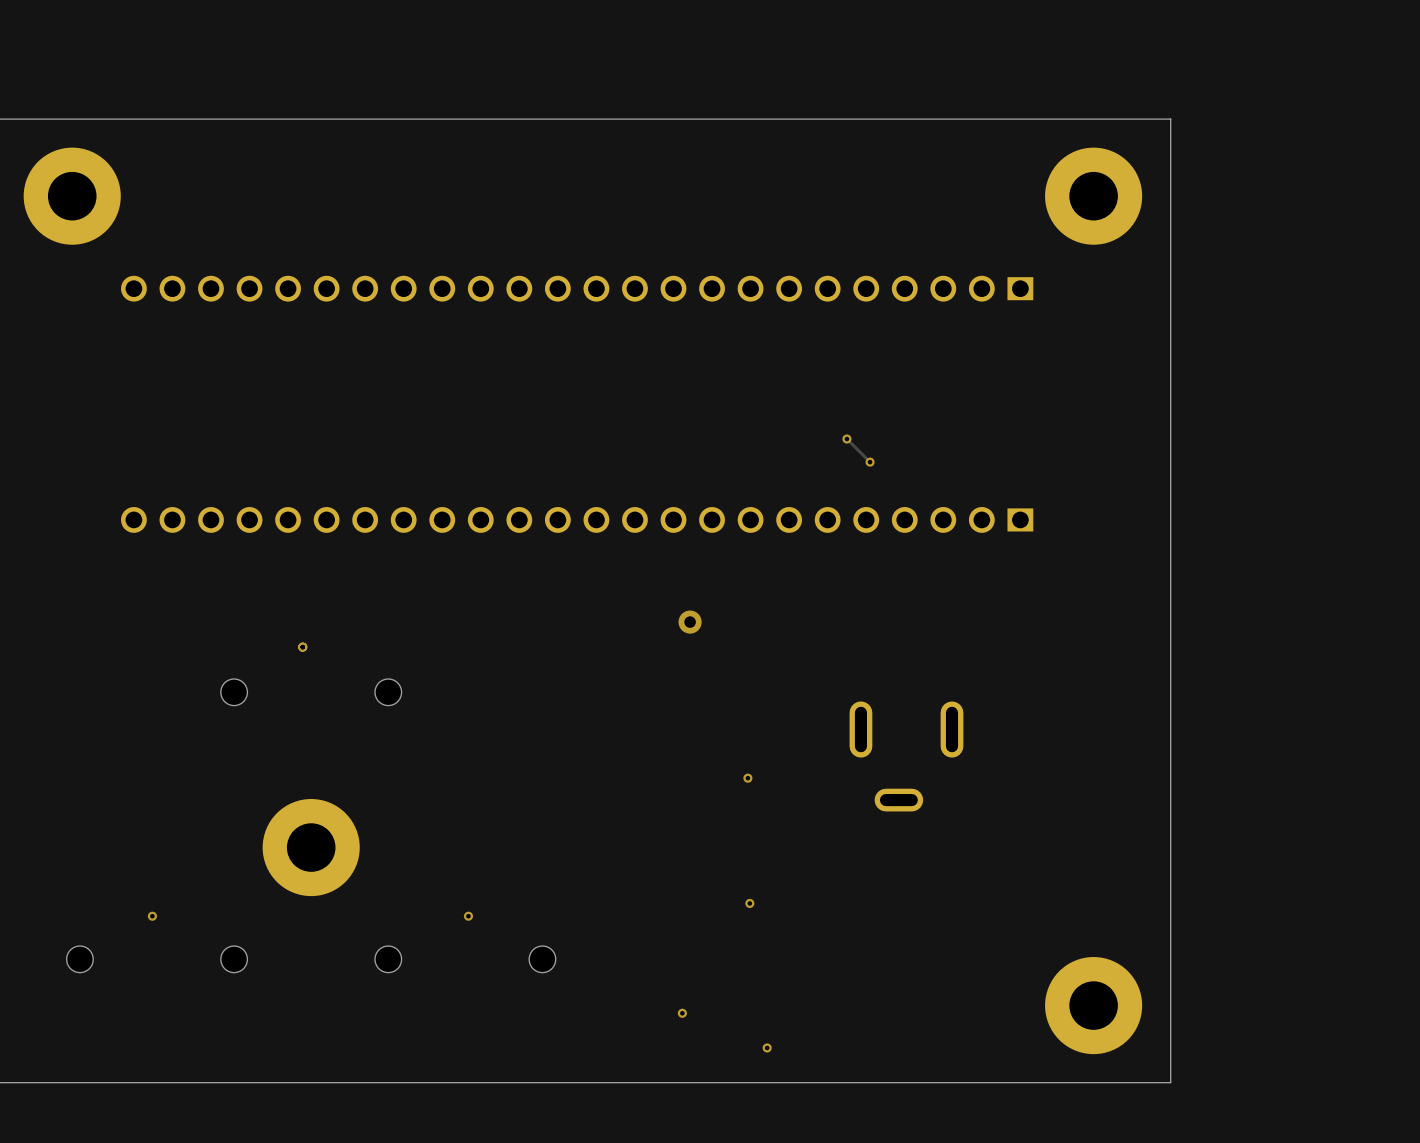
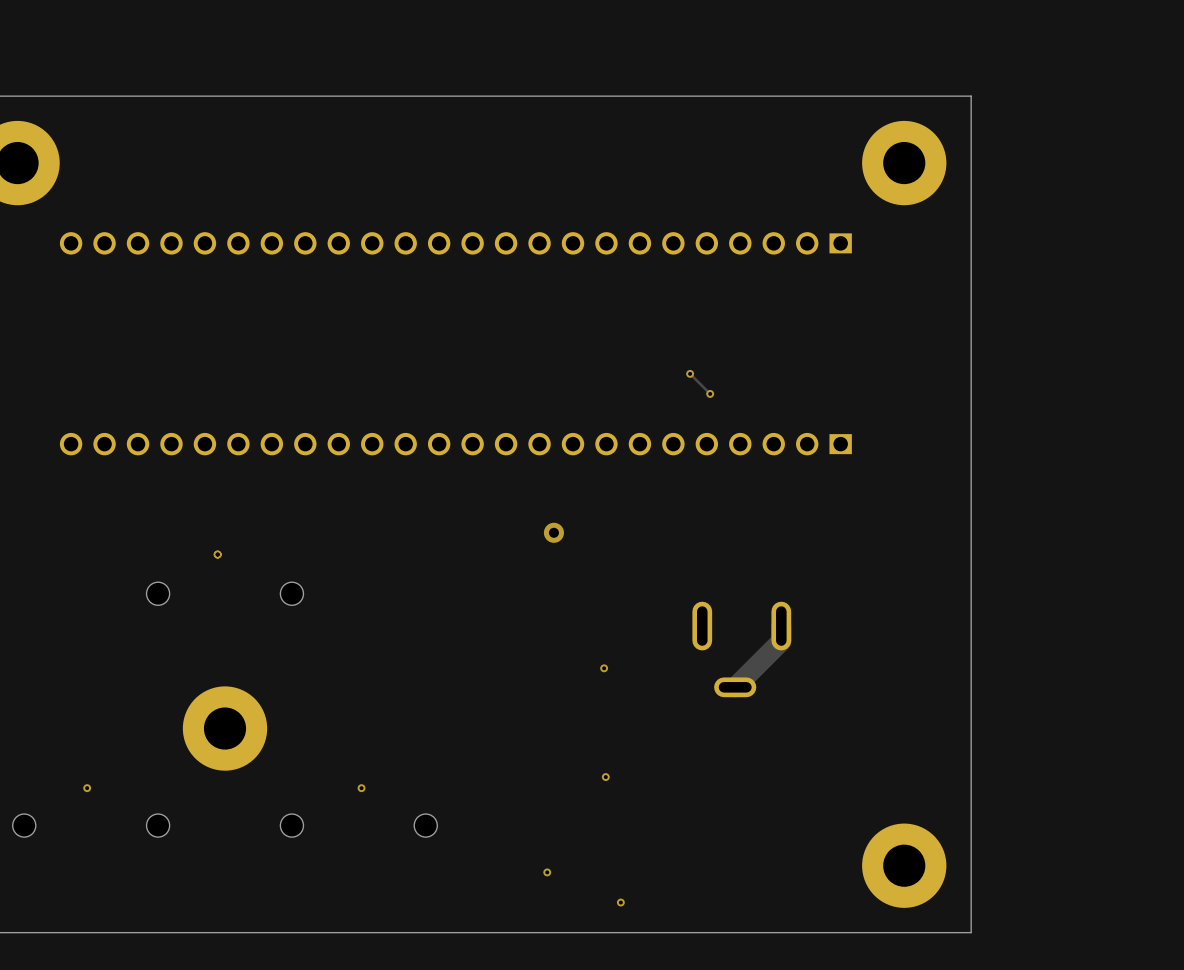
track: none -> (781, 626) (781, 641) (735, 687)

